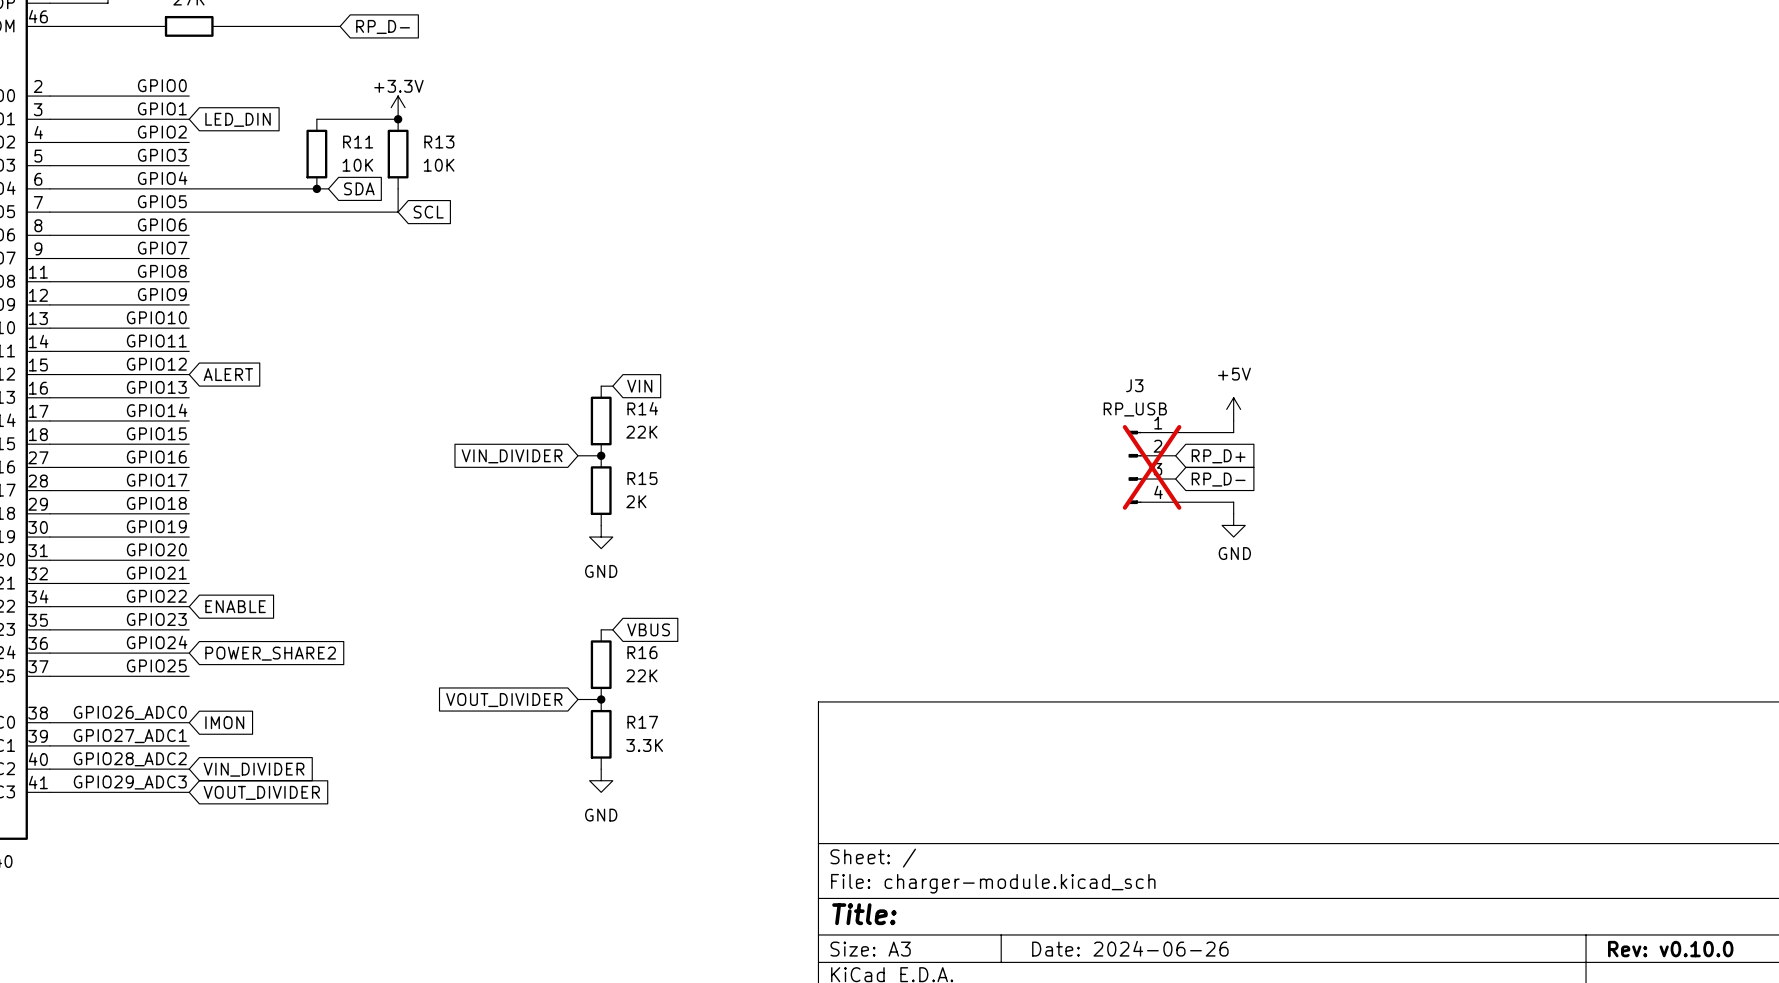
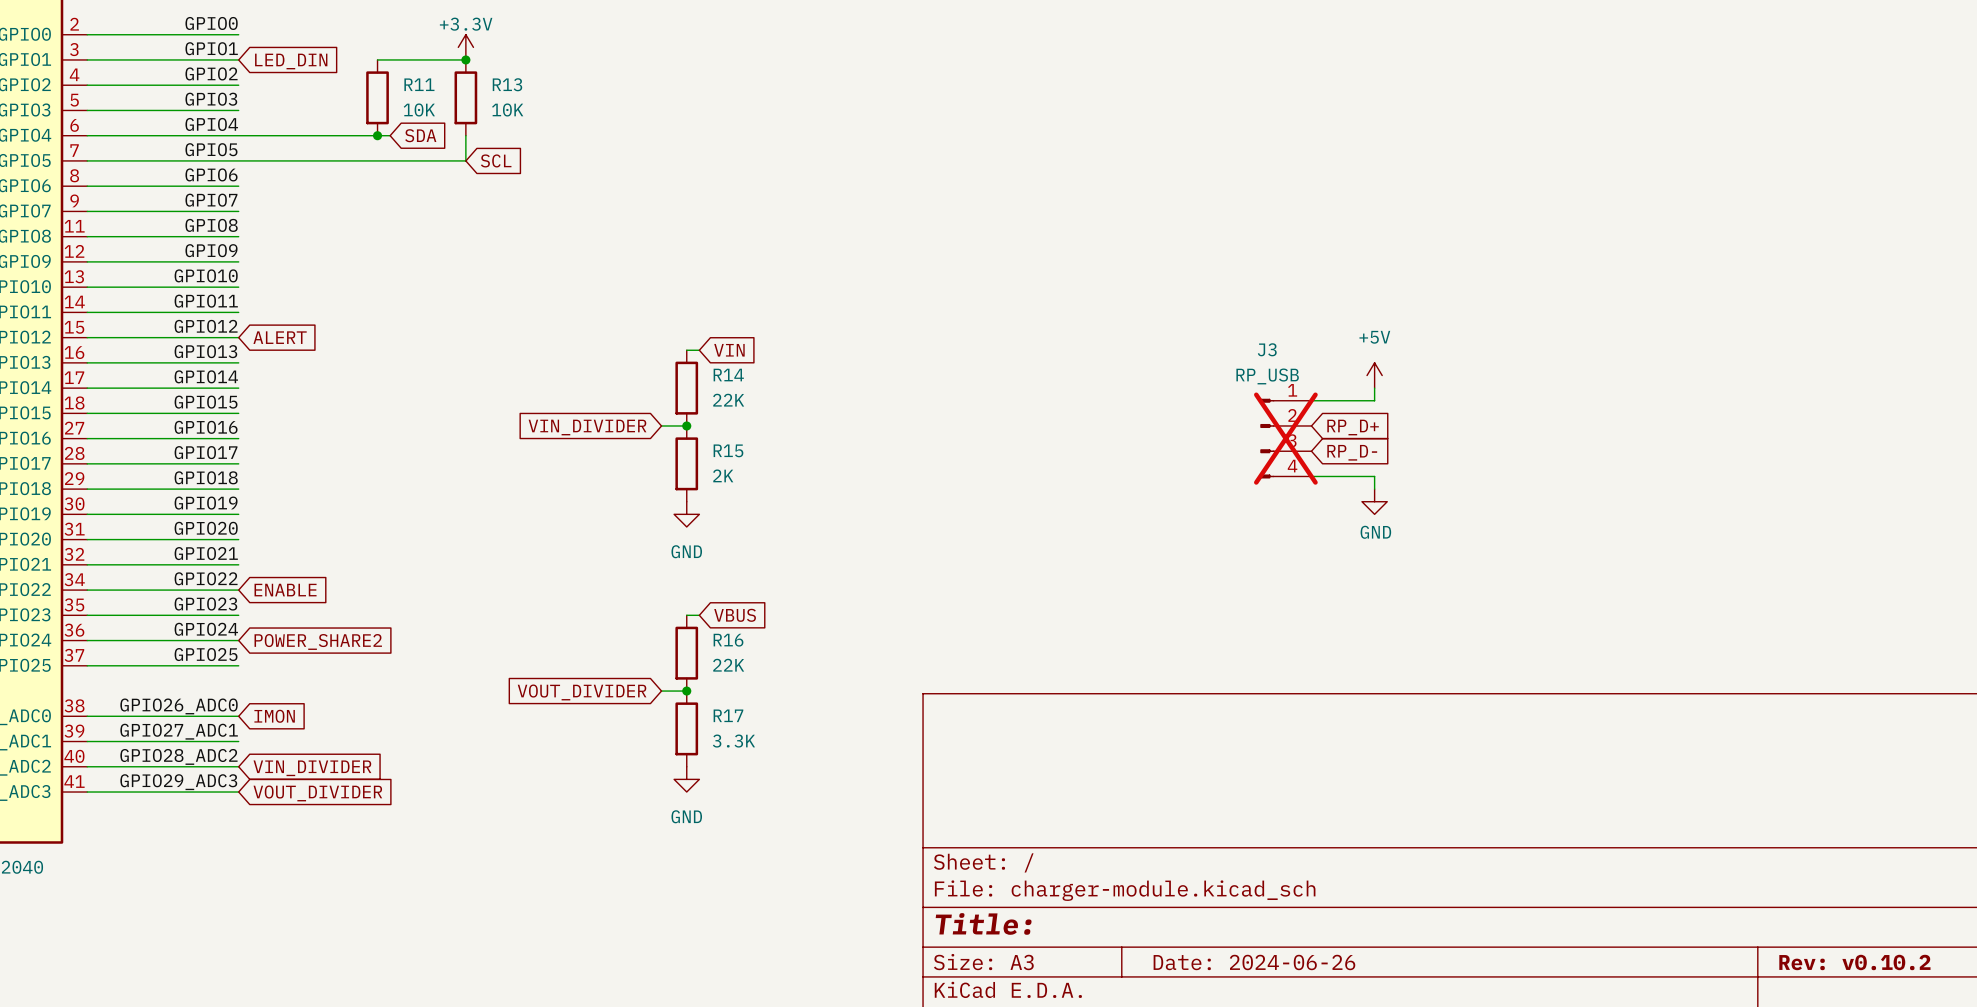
title block: Rev: v0.10.0 (1670, 949) -> Rev: v0.10.2 (1854, 962)

